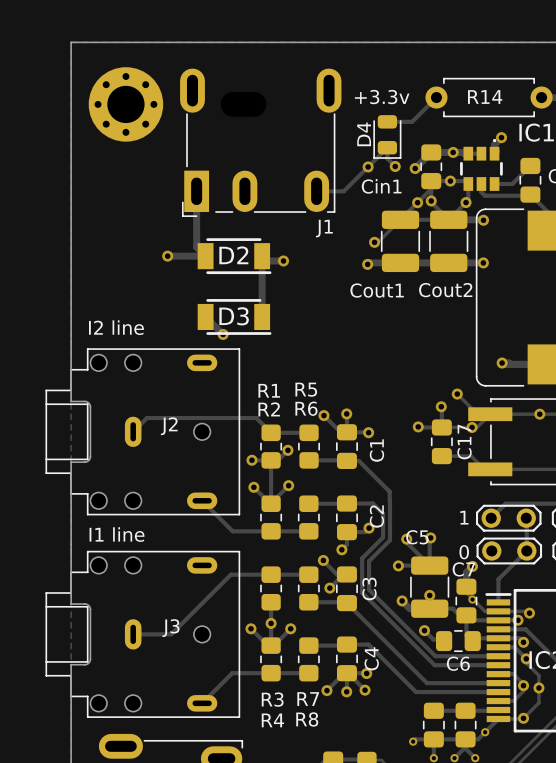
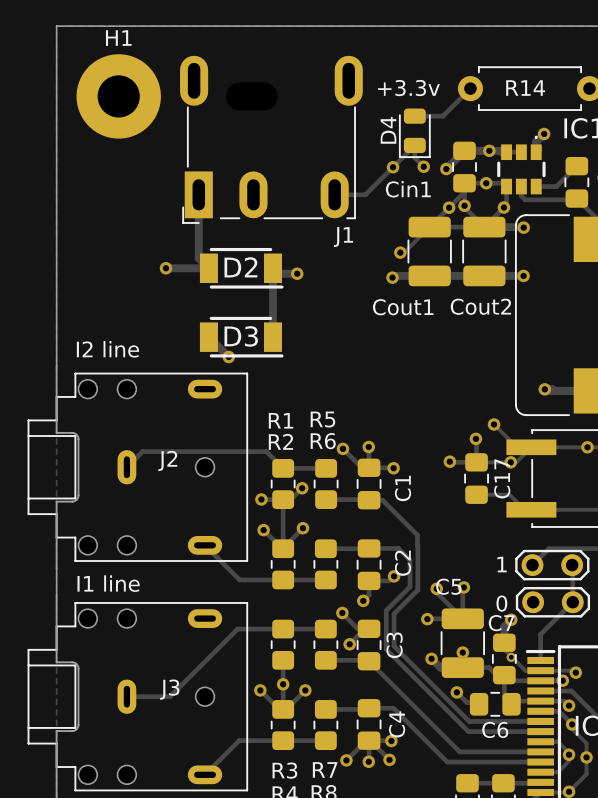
part: (125, 104) -> none
H1: none -> (118, 96)

